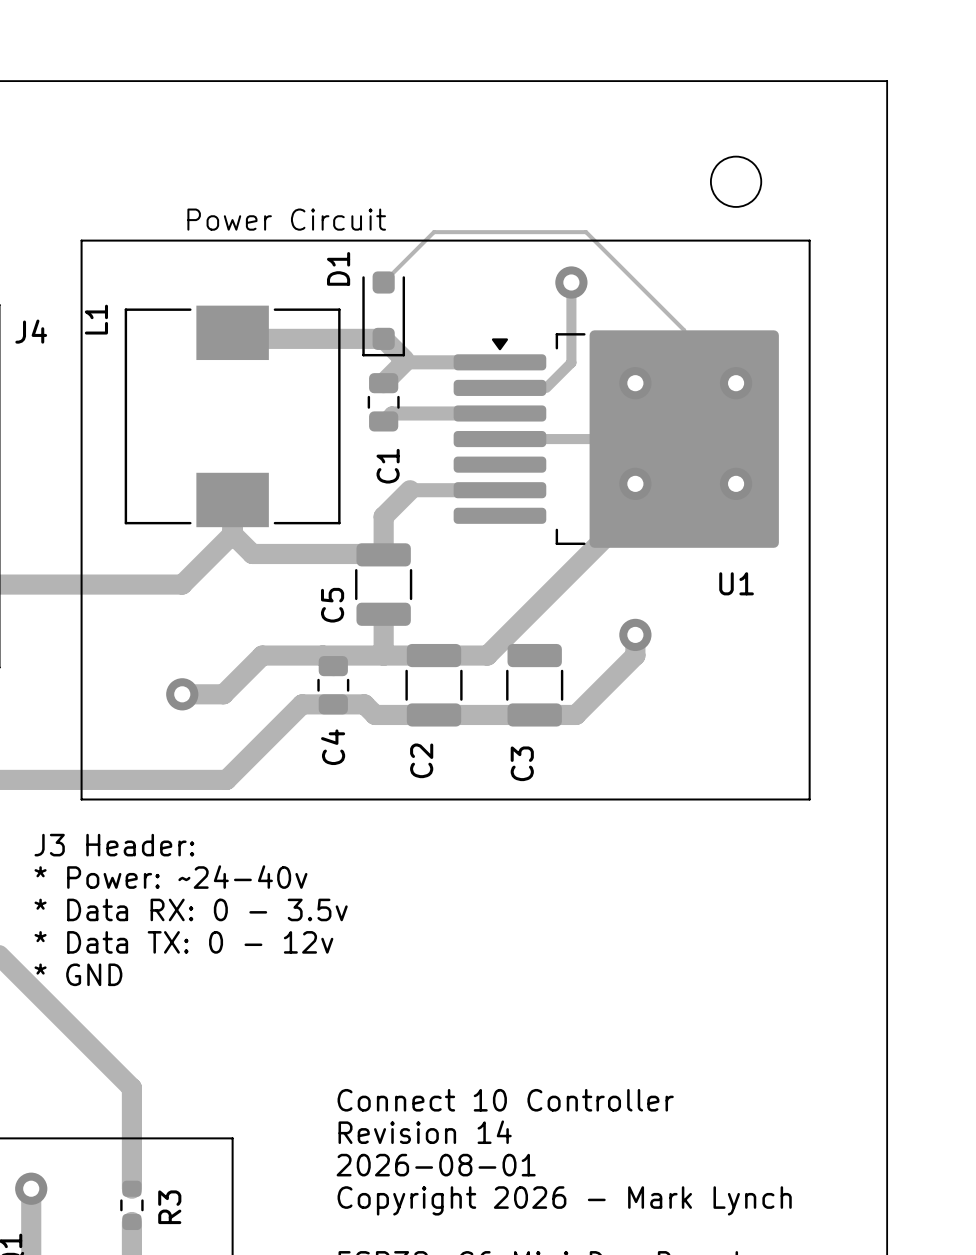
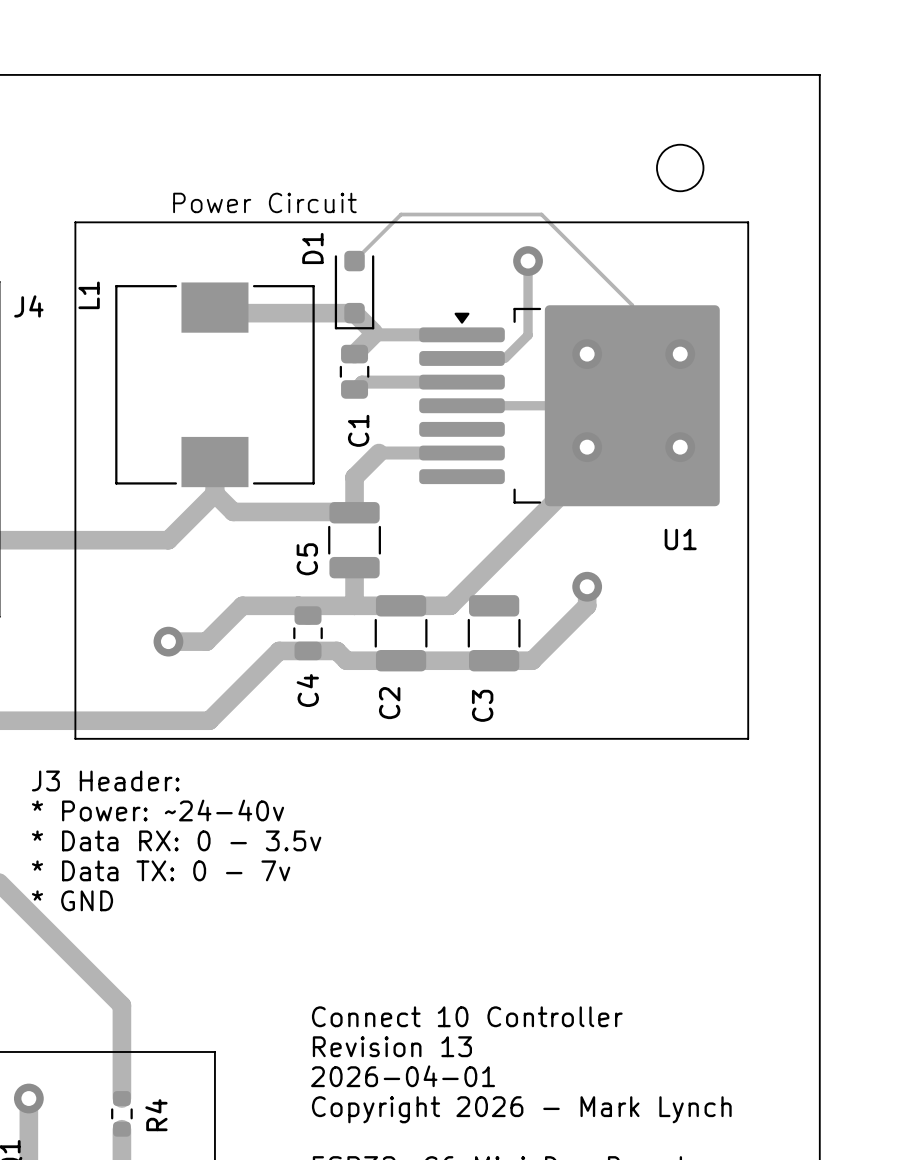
text: * Data TX: 0 - 12v (183, 942) -> * Data TX: 0 - 7v (161, 870)
text: Revision 14 (425, 1132) -> Revision 13 (392, 1046)
text: 2026-08-01 (436, 1165) -> 2026-04-01 (403, 1076)
R3 name: R3 (169, 1207) -> R4 (156, 1115)

